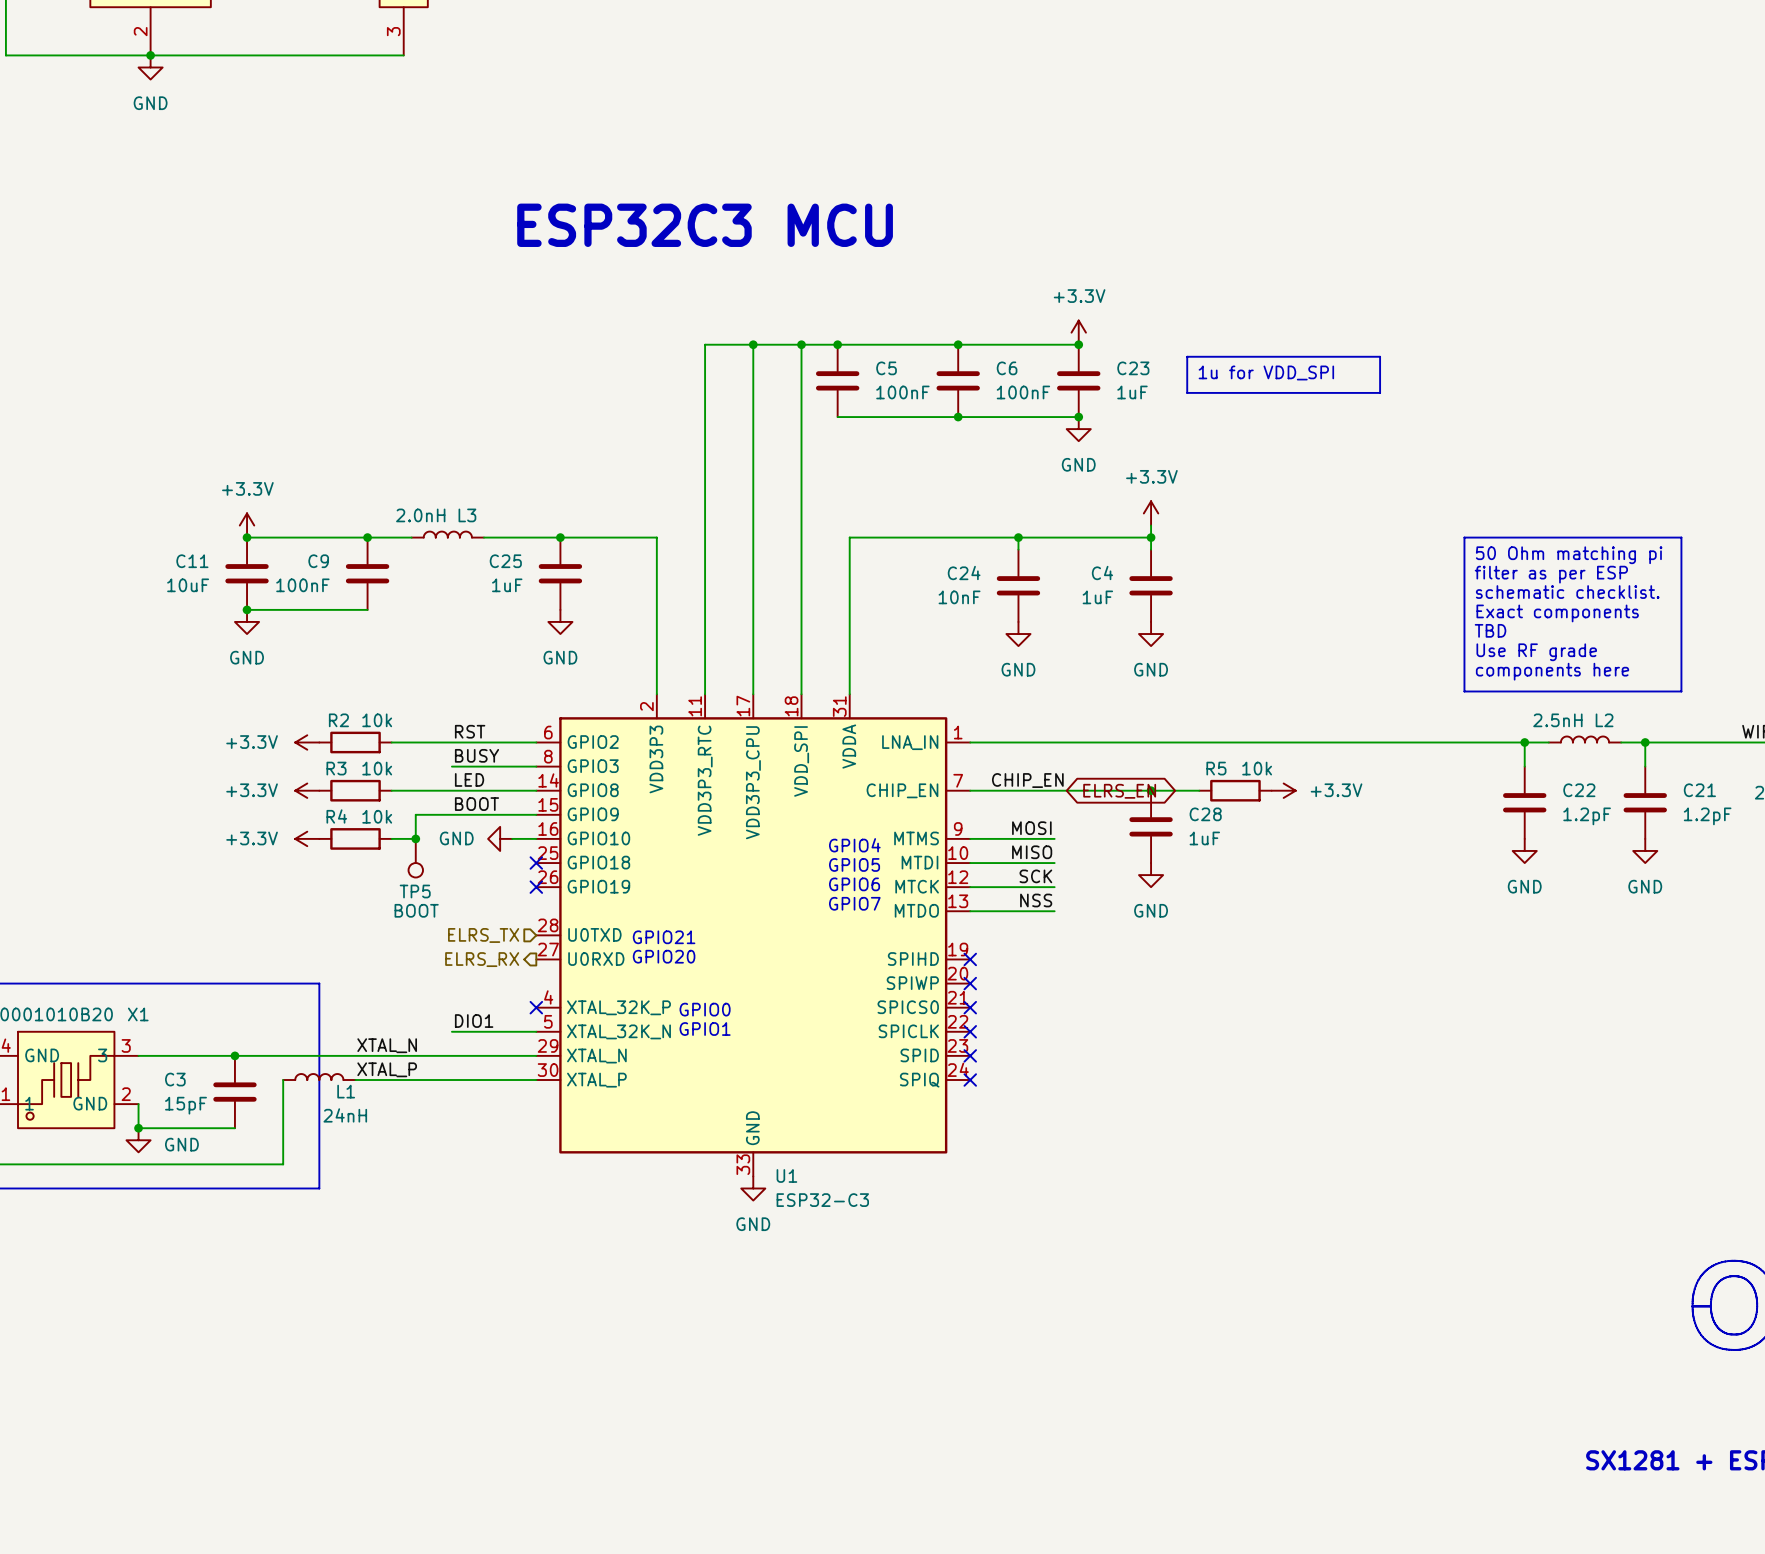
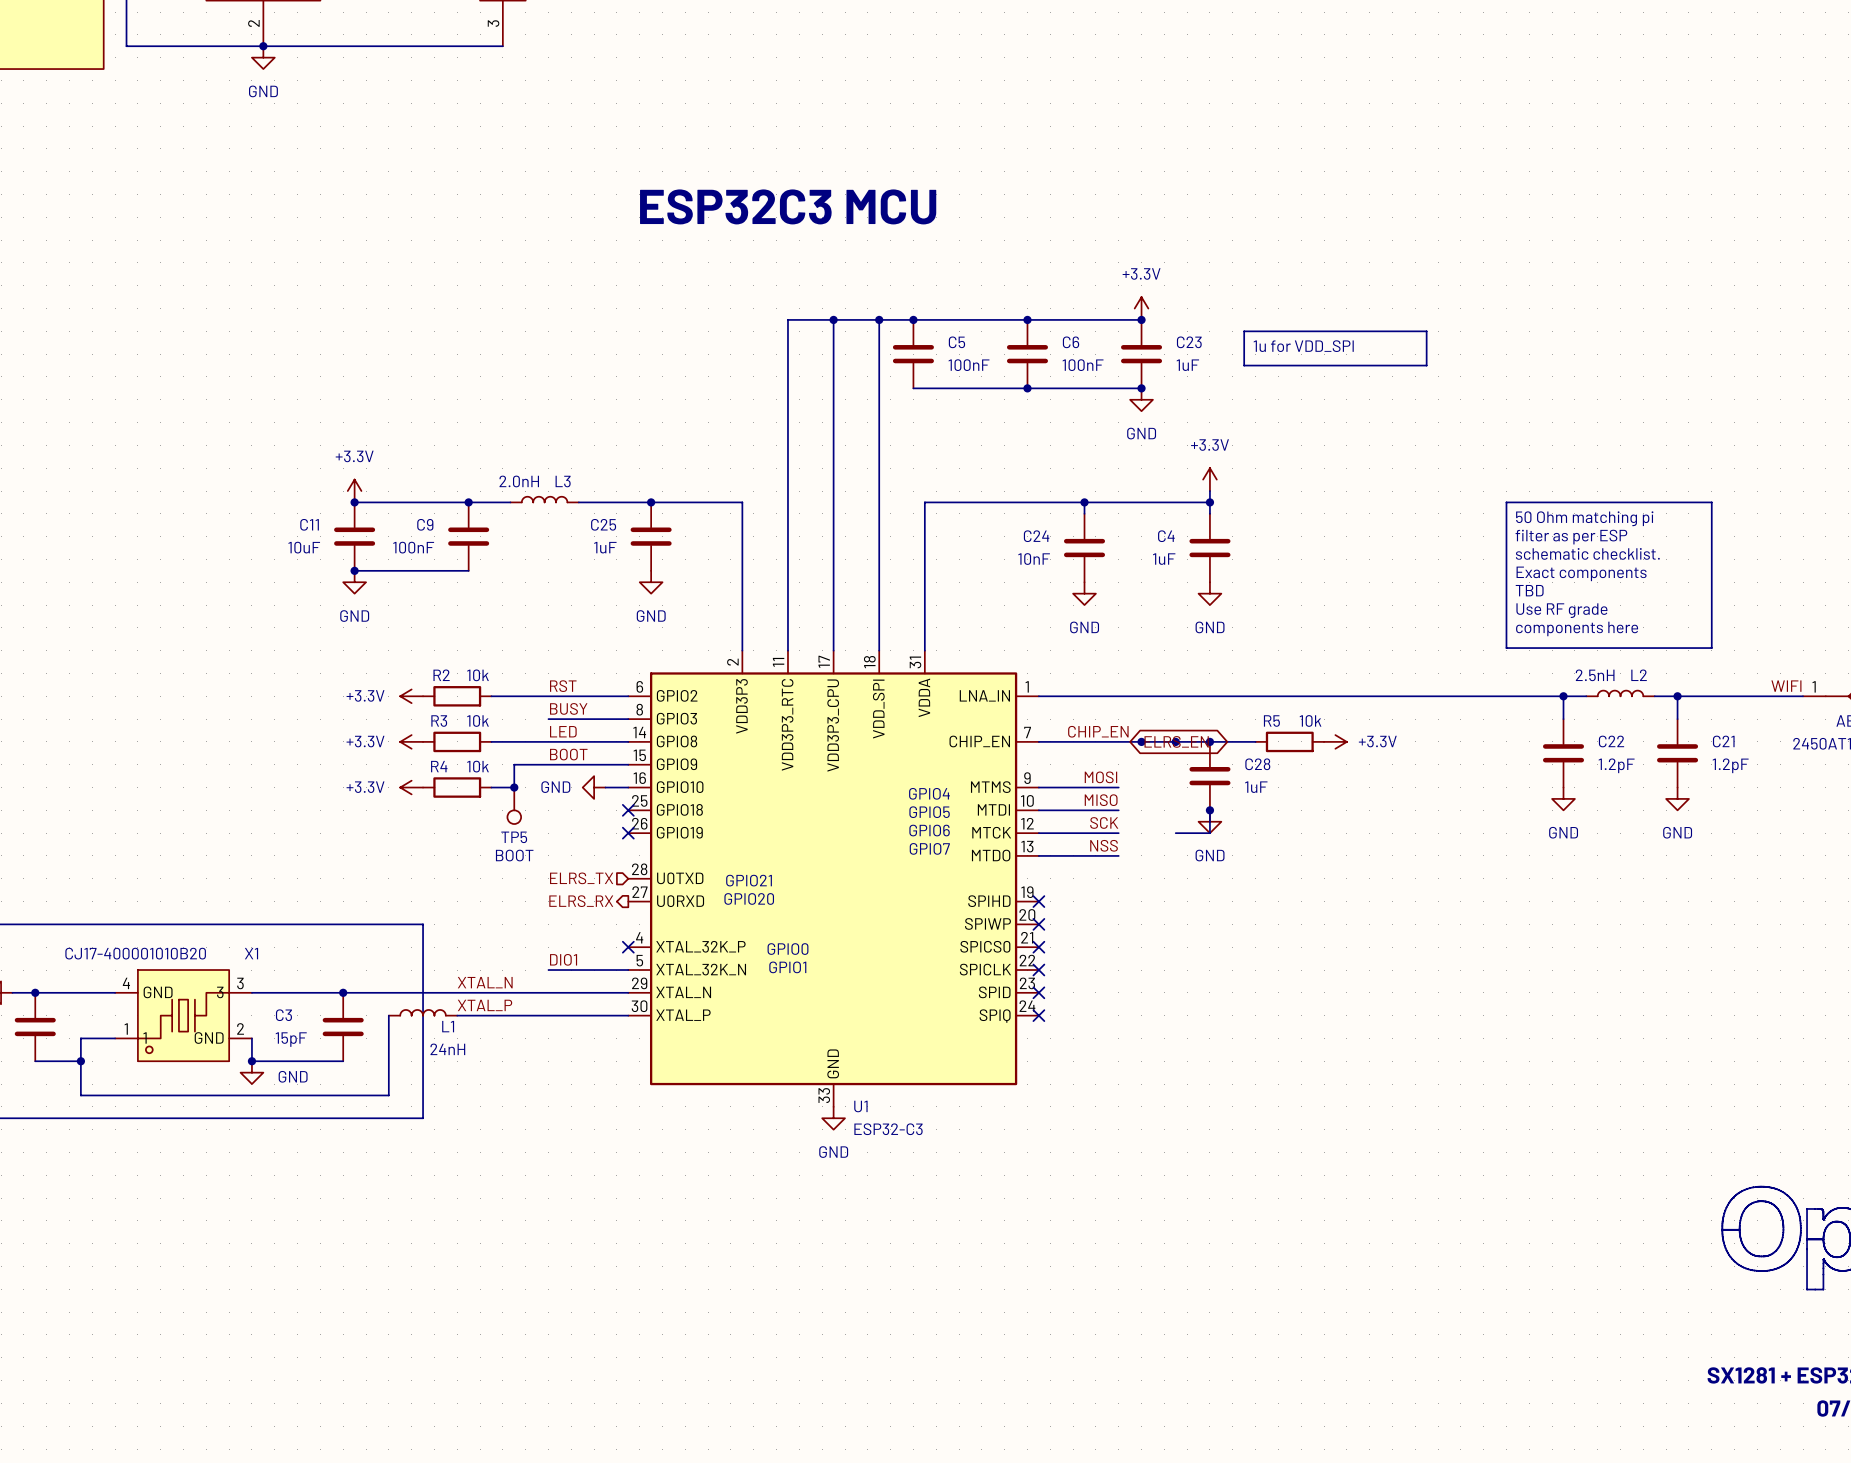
junction: none -> (1141, 741)
junction: none -> (1175, 741)
wire: none -> (1209, 810) (1209, 833) (1175, 833)
junction: none -> (1209, 810)

